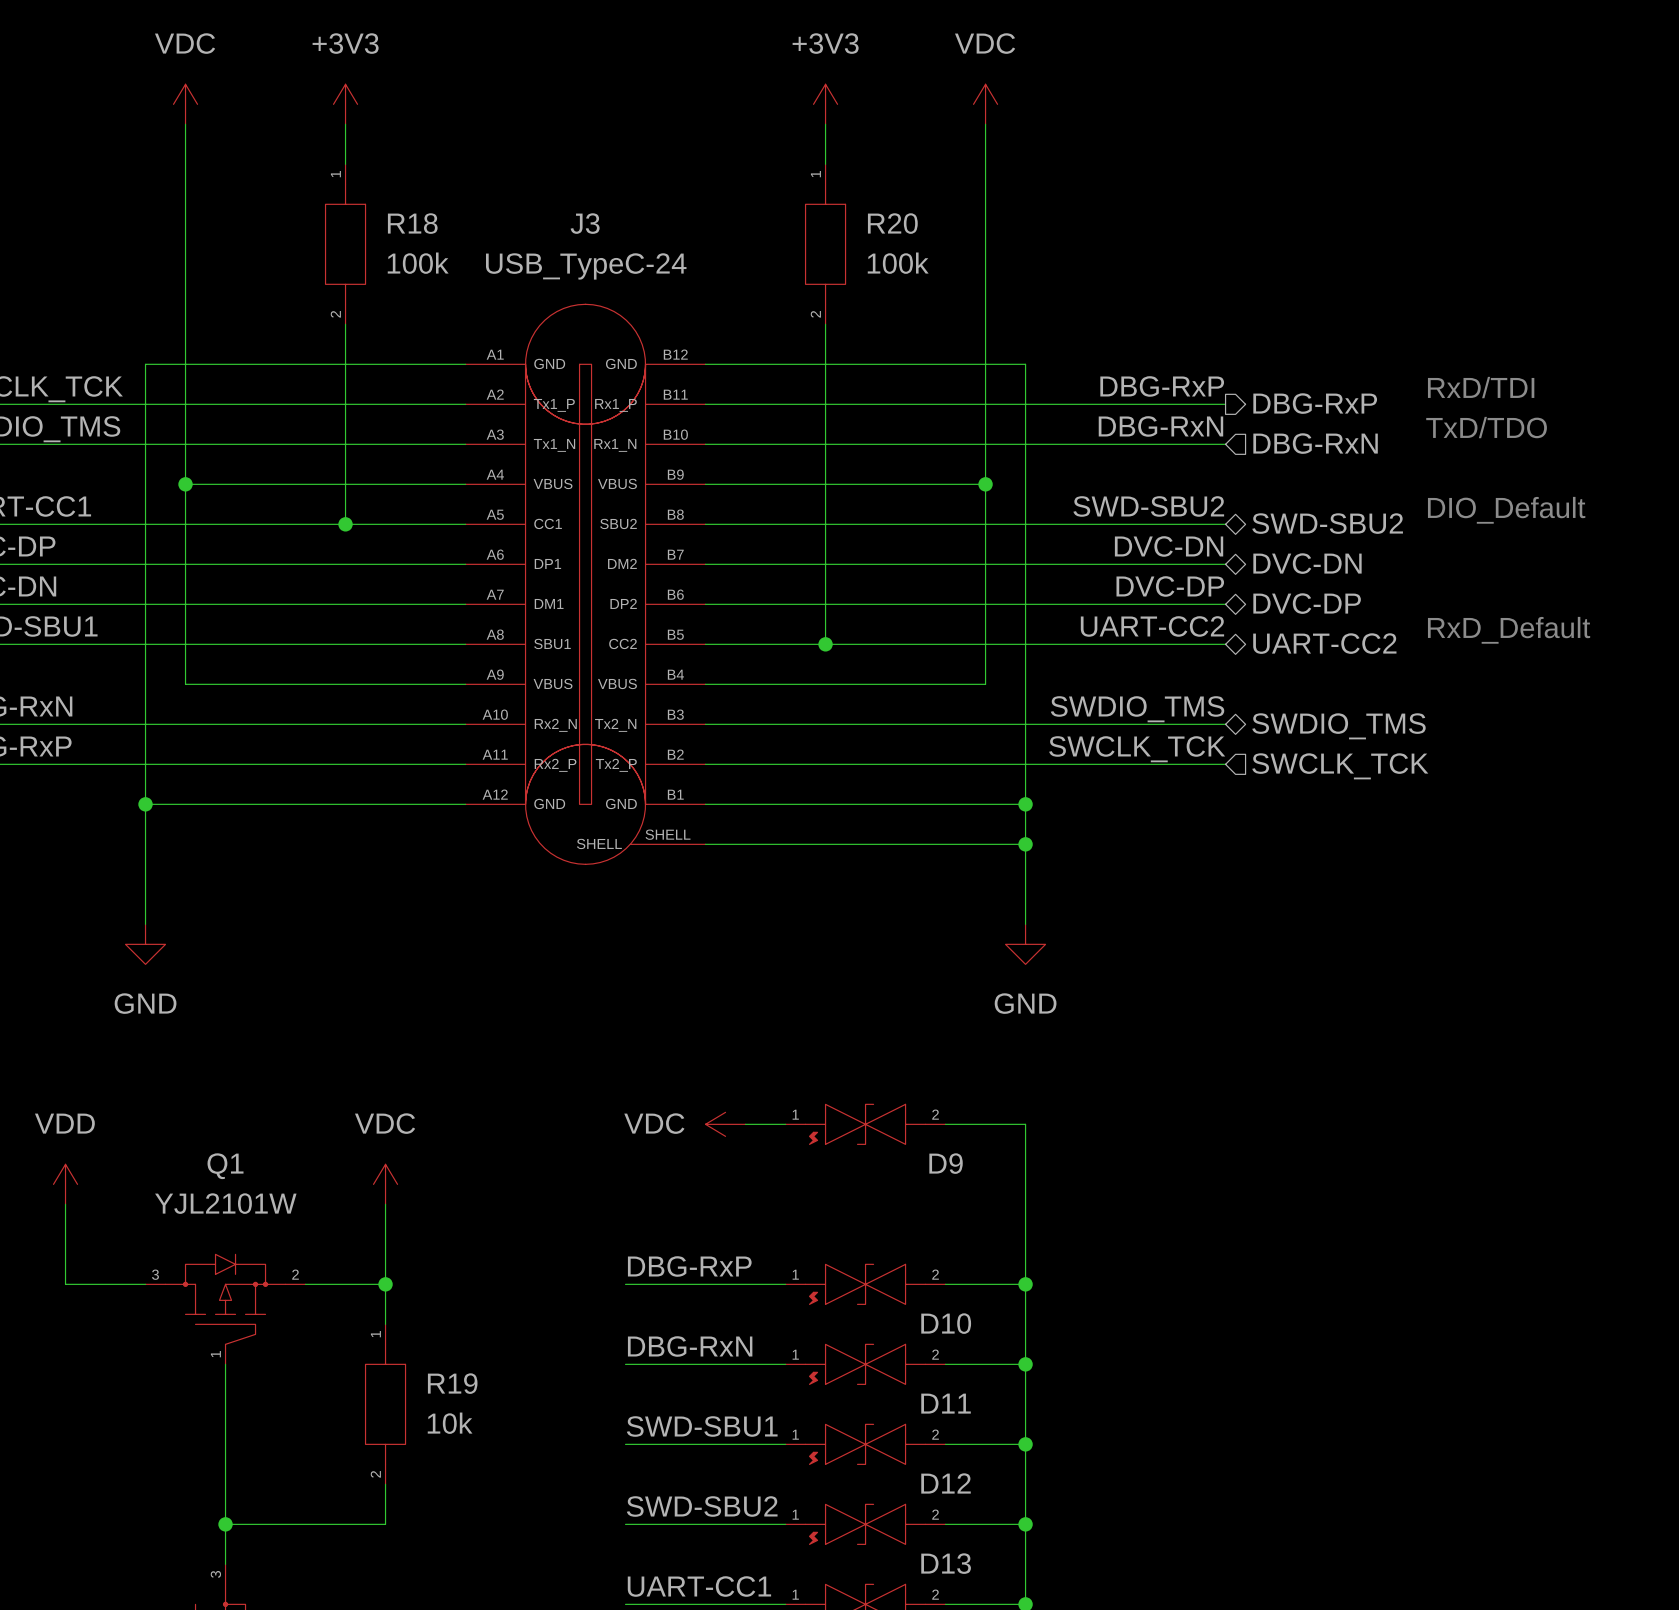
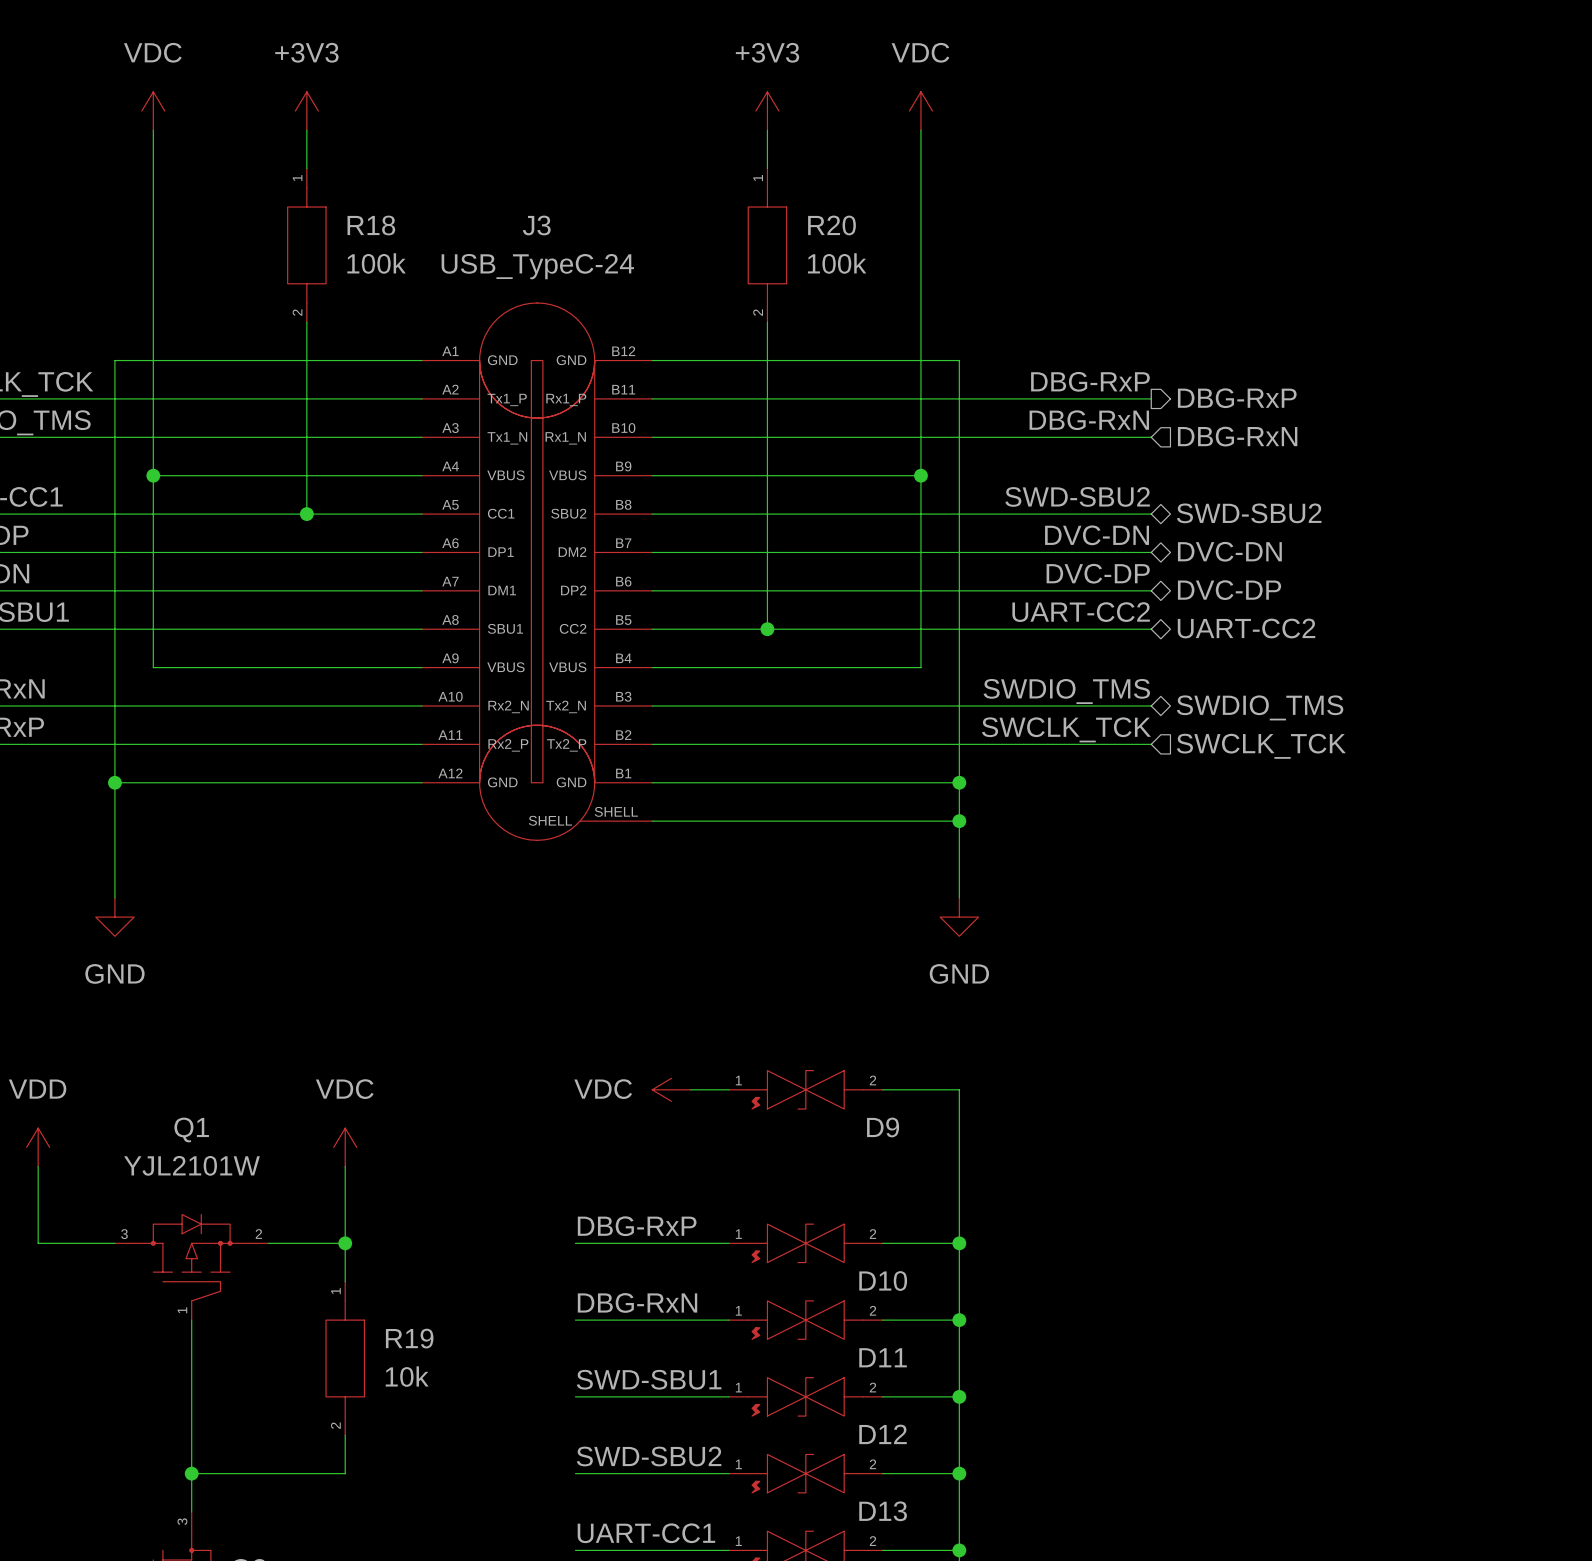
text: RxD/TDI (1481, 387) -> none
text: TxD/TDO (1486, 427) -> none
text: DIO_Default (1506, 510) -> none
text: RxD_Default (1509, 630) -> none

